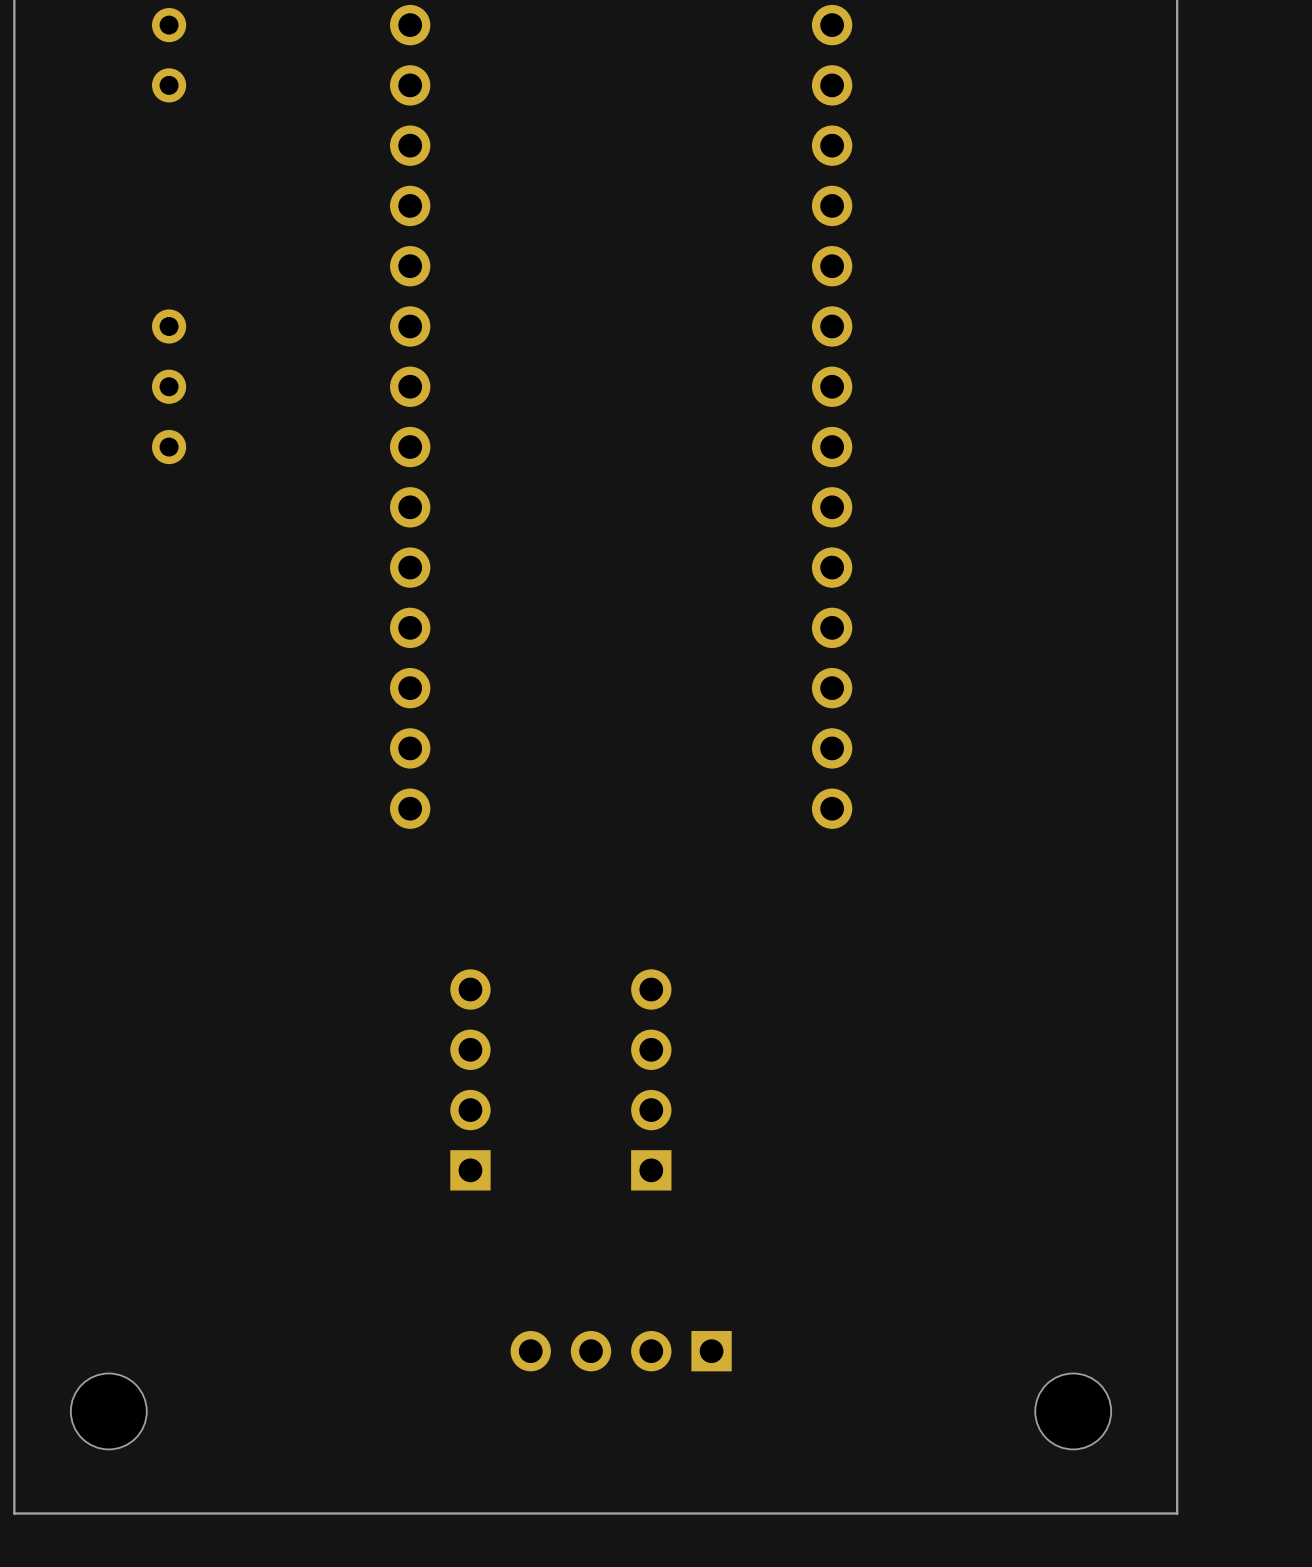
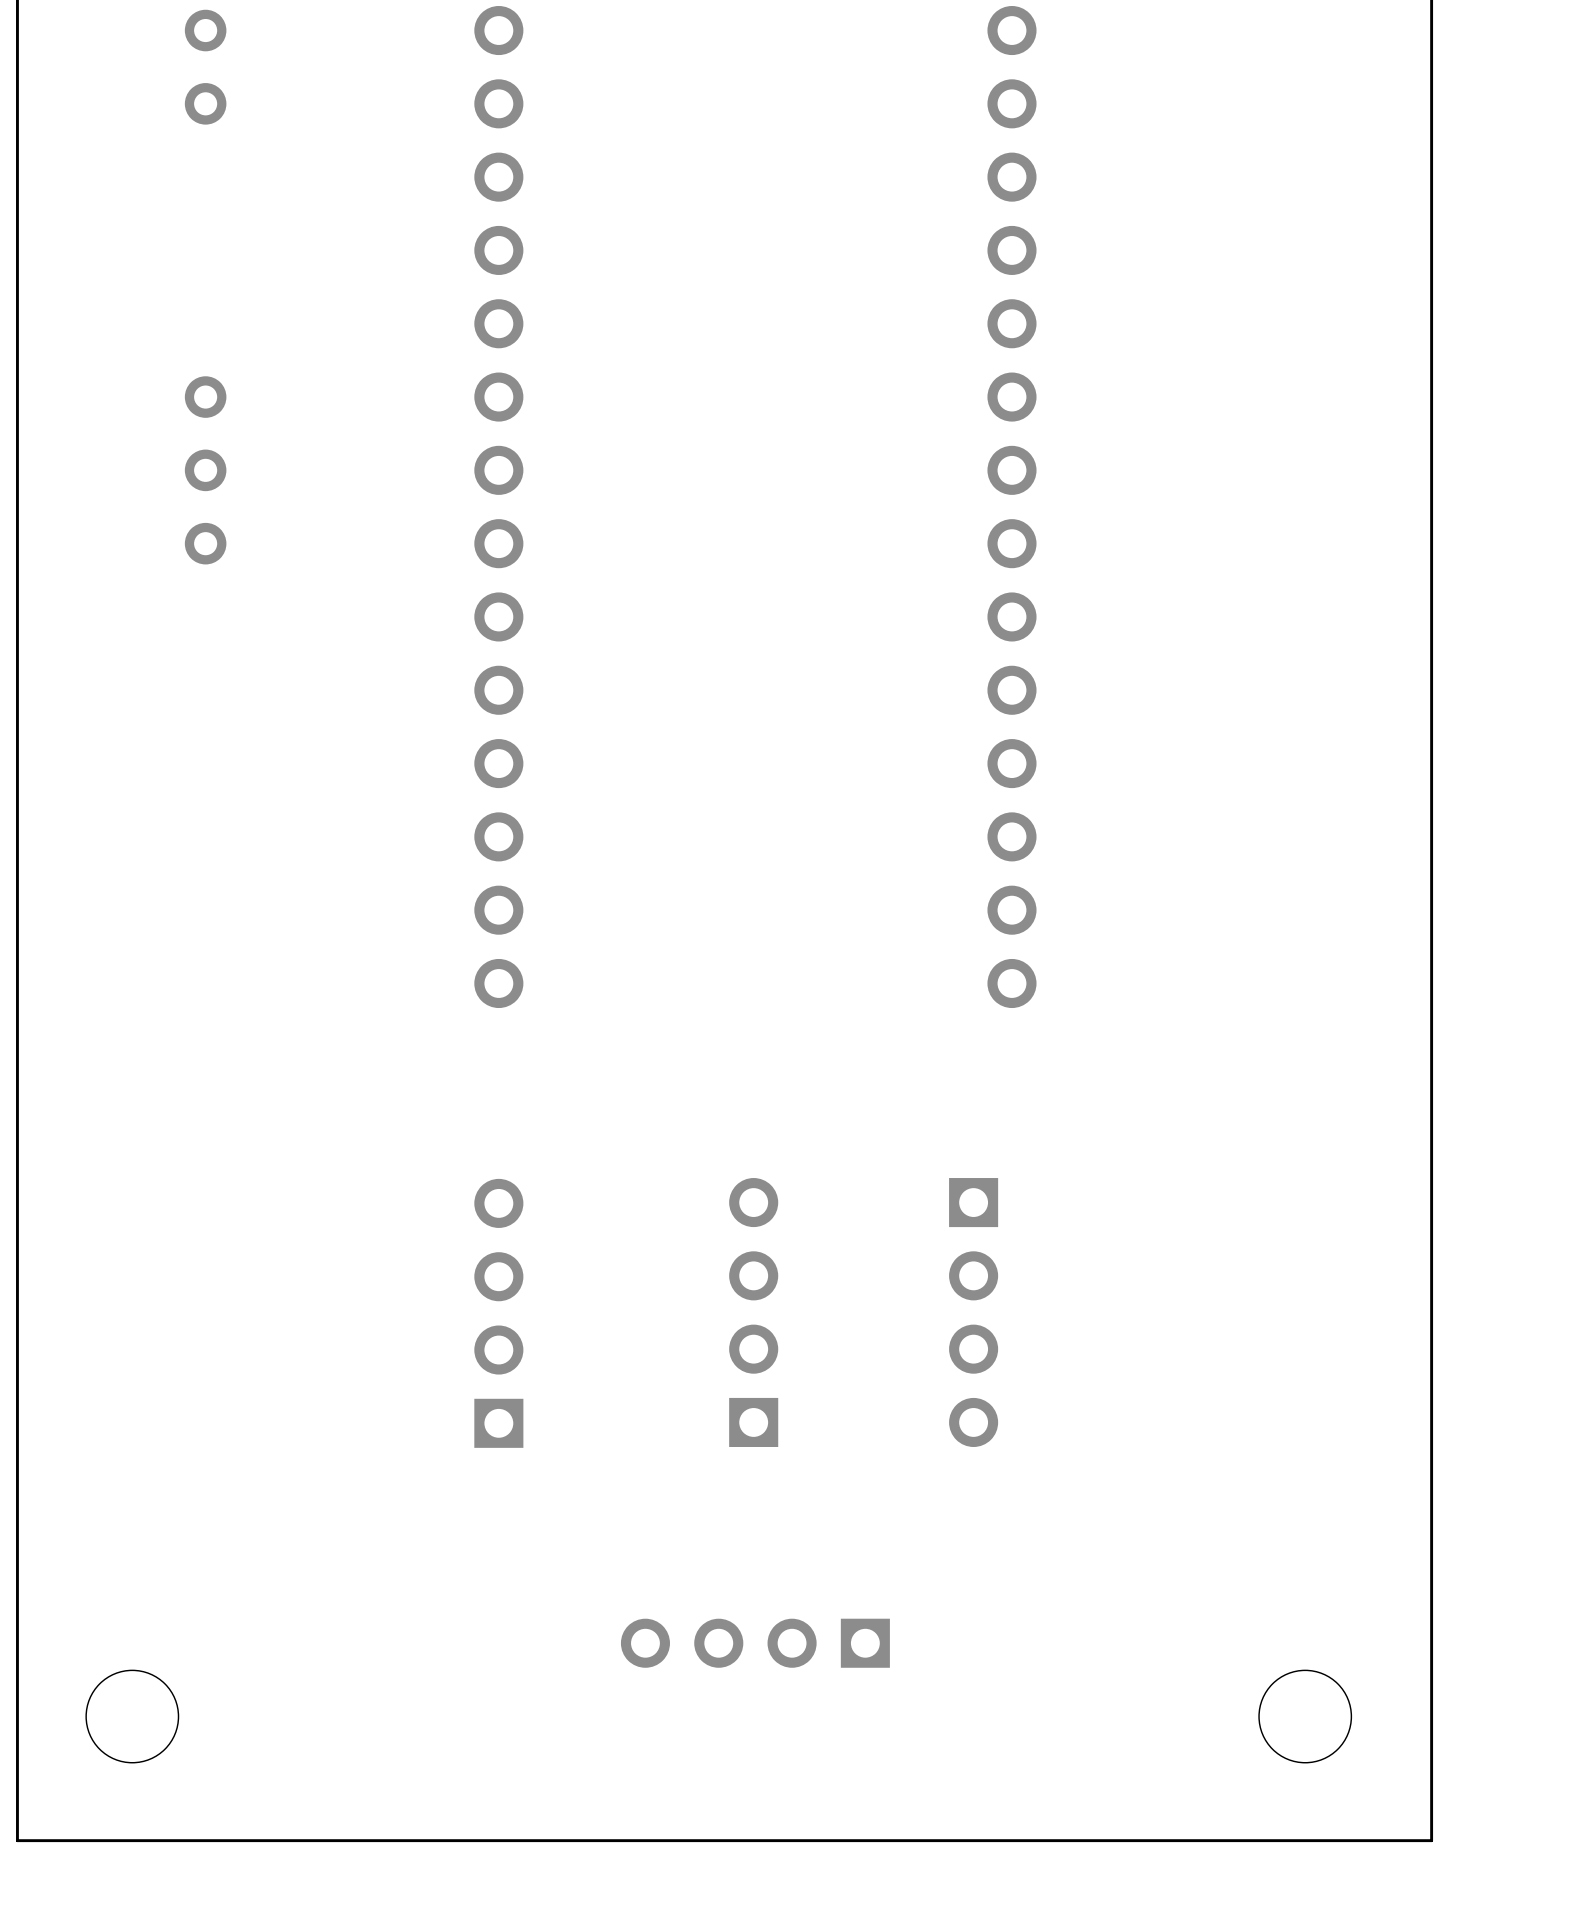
part position: (470, 1079) -> (498, 1313)
part position: (651, 1079) -> (753, 1312)
part: none -> (973, 1312)

